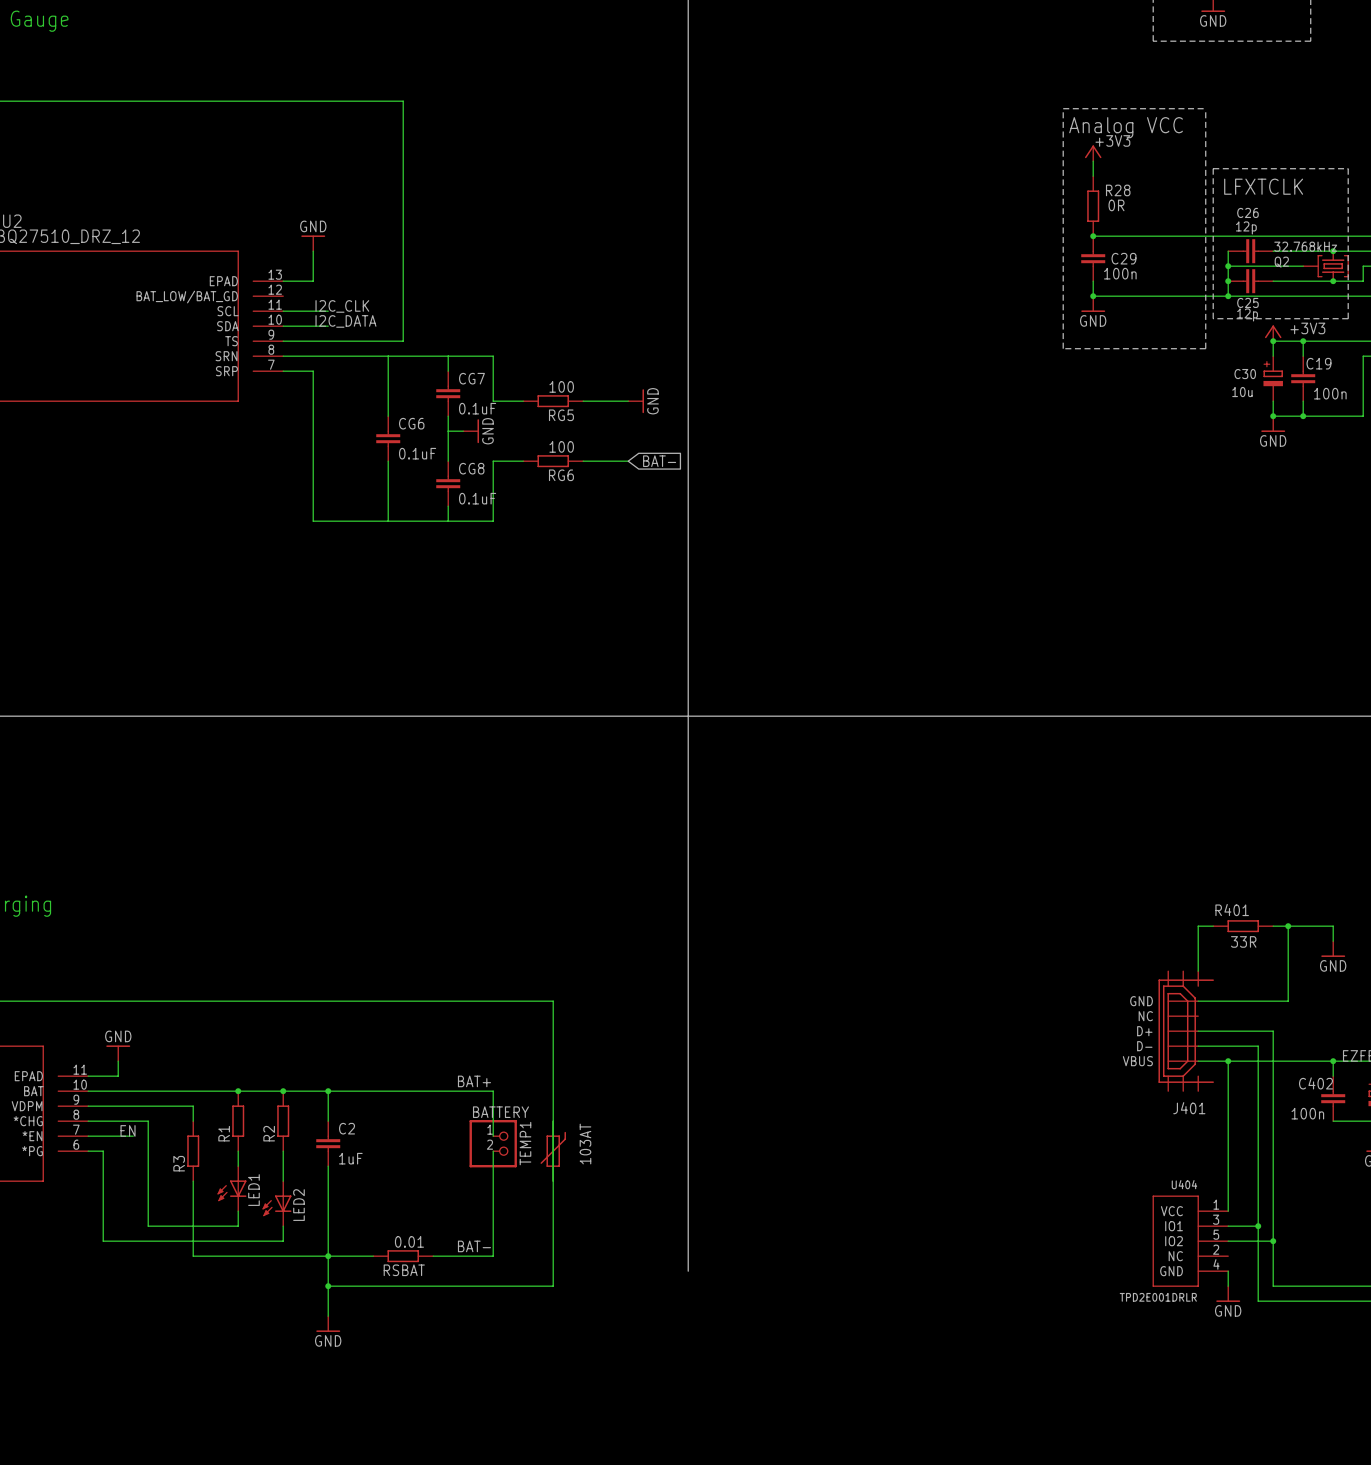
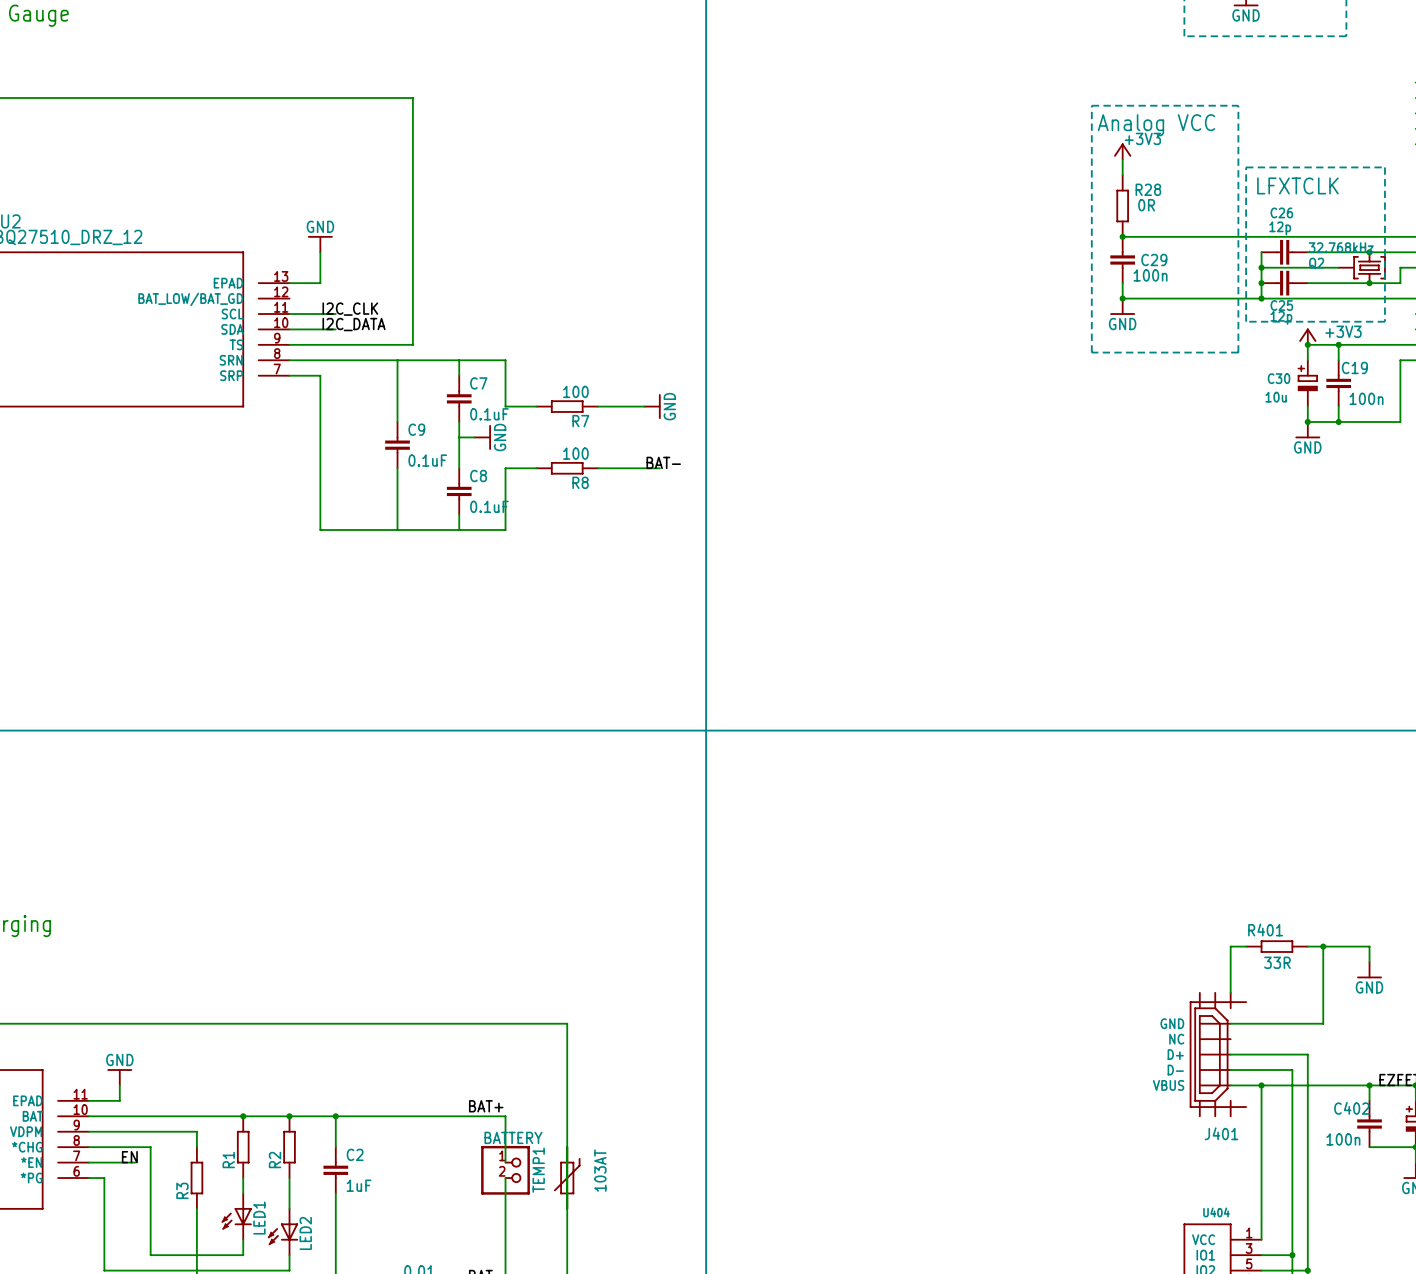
CG7 name: CG7 (471, 378) -> C7 (478, 383)
RG5 name: RG5 (561, 415) -> R7 (580, 421)
CG6 name: CG6 (411, 423) -> C9 (416, 429)
label: none -> BAT- (663, 462)
wire: none -> (644, 468) (659, 468)
global label: BAT- (659, 461) -> none
CG8 name: CG8 (471, 468) -> C8 (478, 476)
RG6 name: RG6 (561, 475) -> R8 (580, 482)

